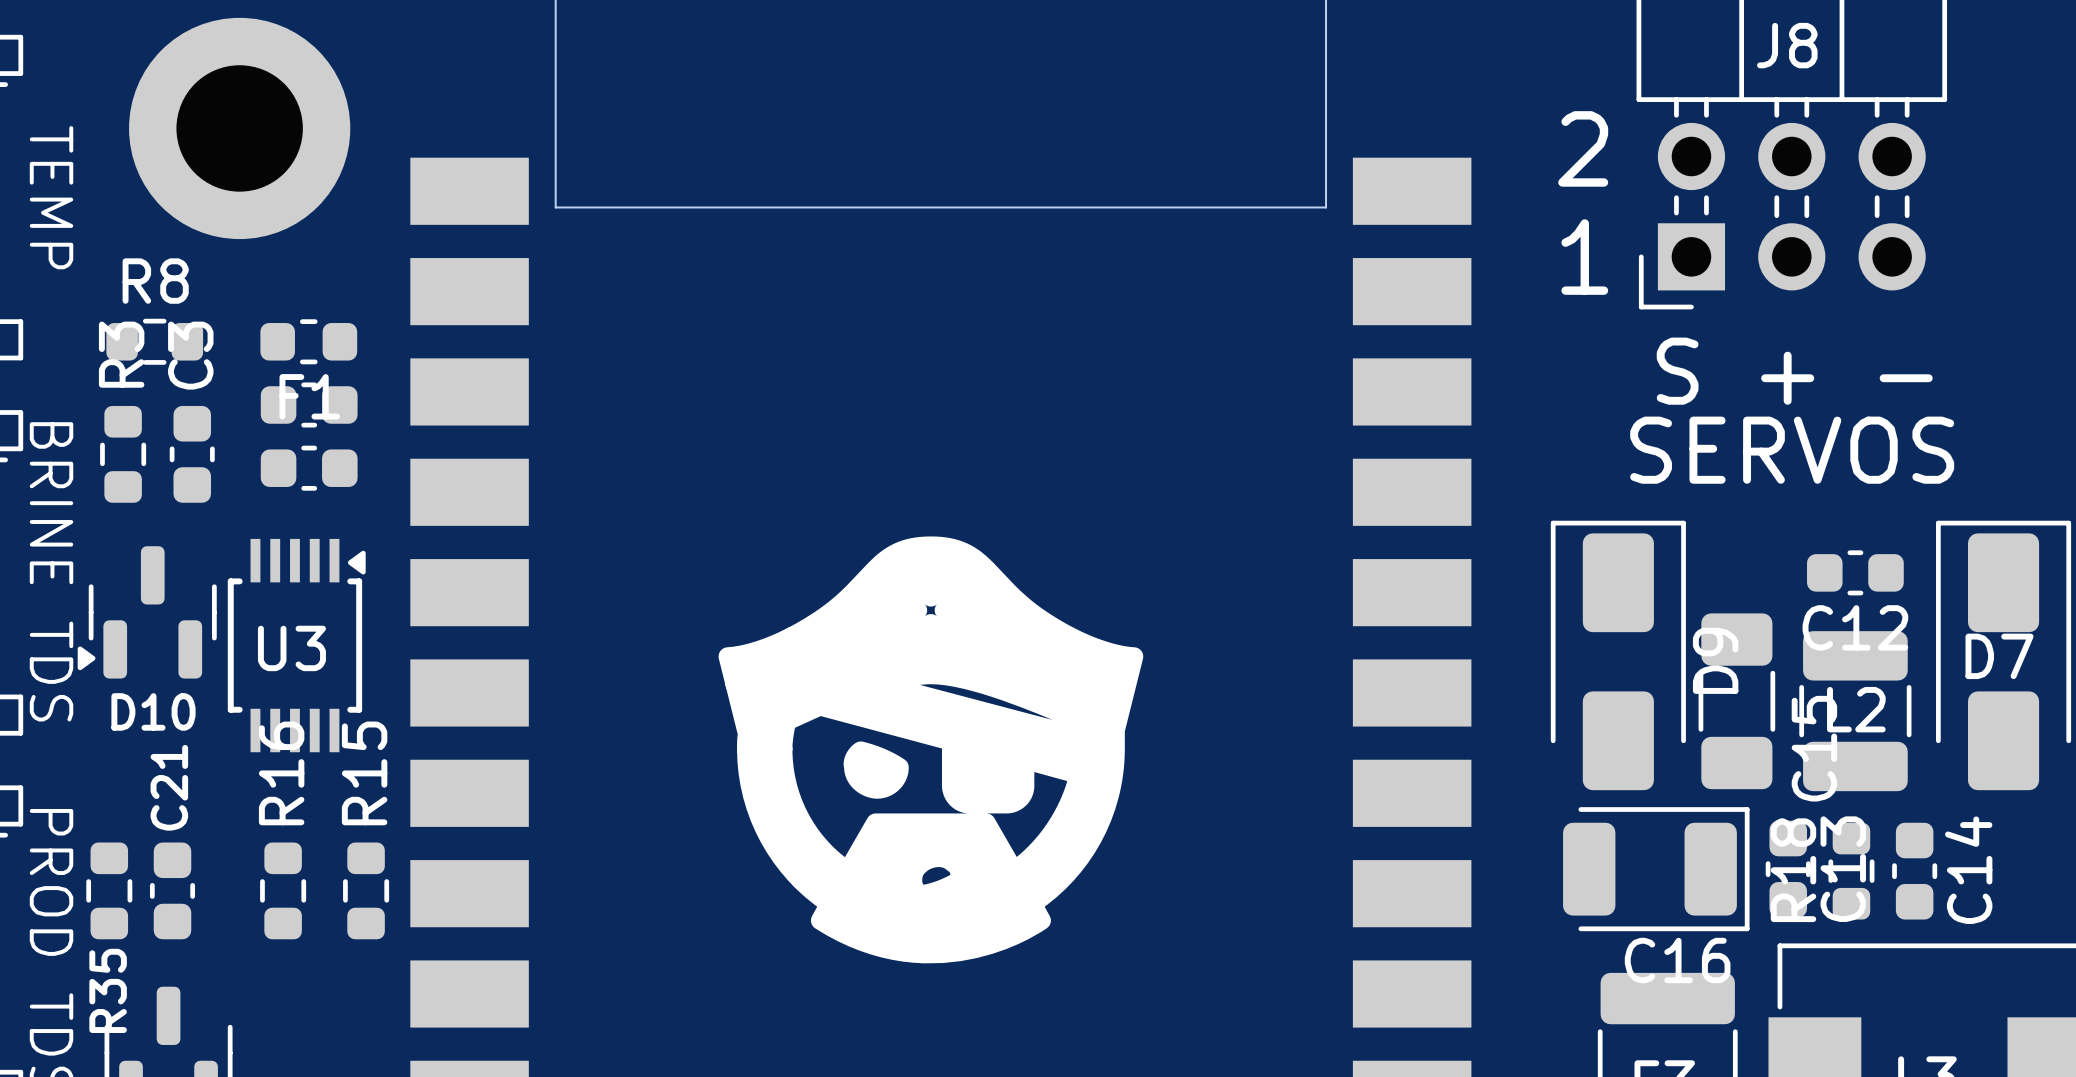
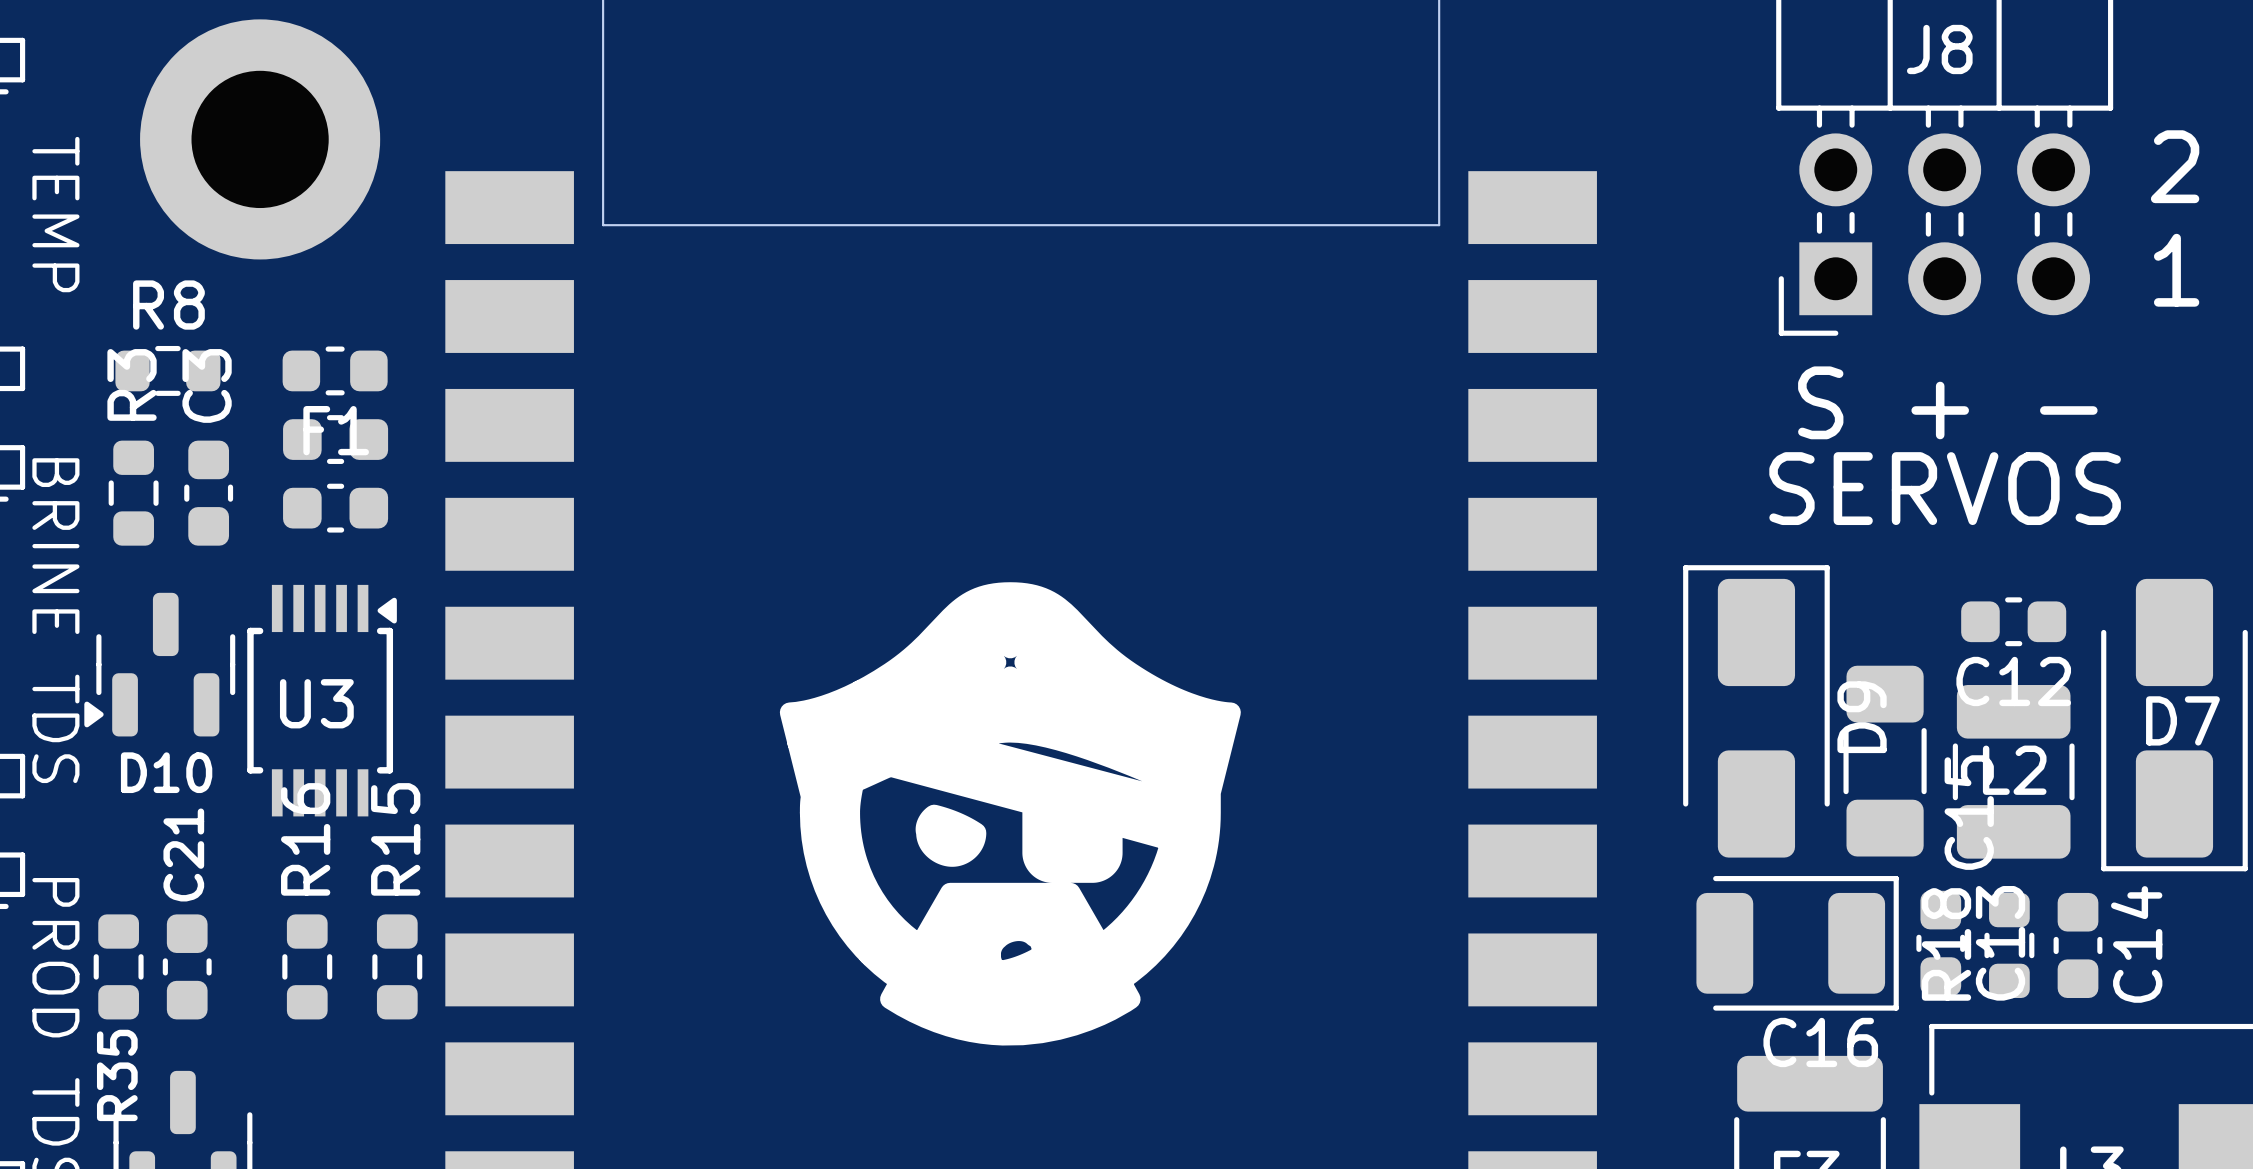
text position: 2 (1583, 148) -> 2 (2175, 166)
text position: 1 (1584, 257) -> 1 (2176, 270)
D7 rotation: 0° (2003, 655) -> 180° (2174, 725)

